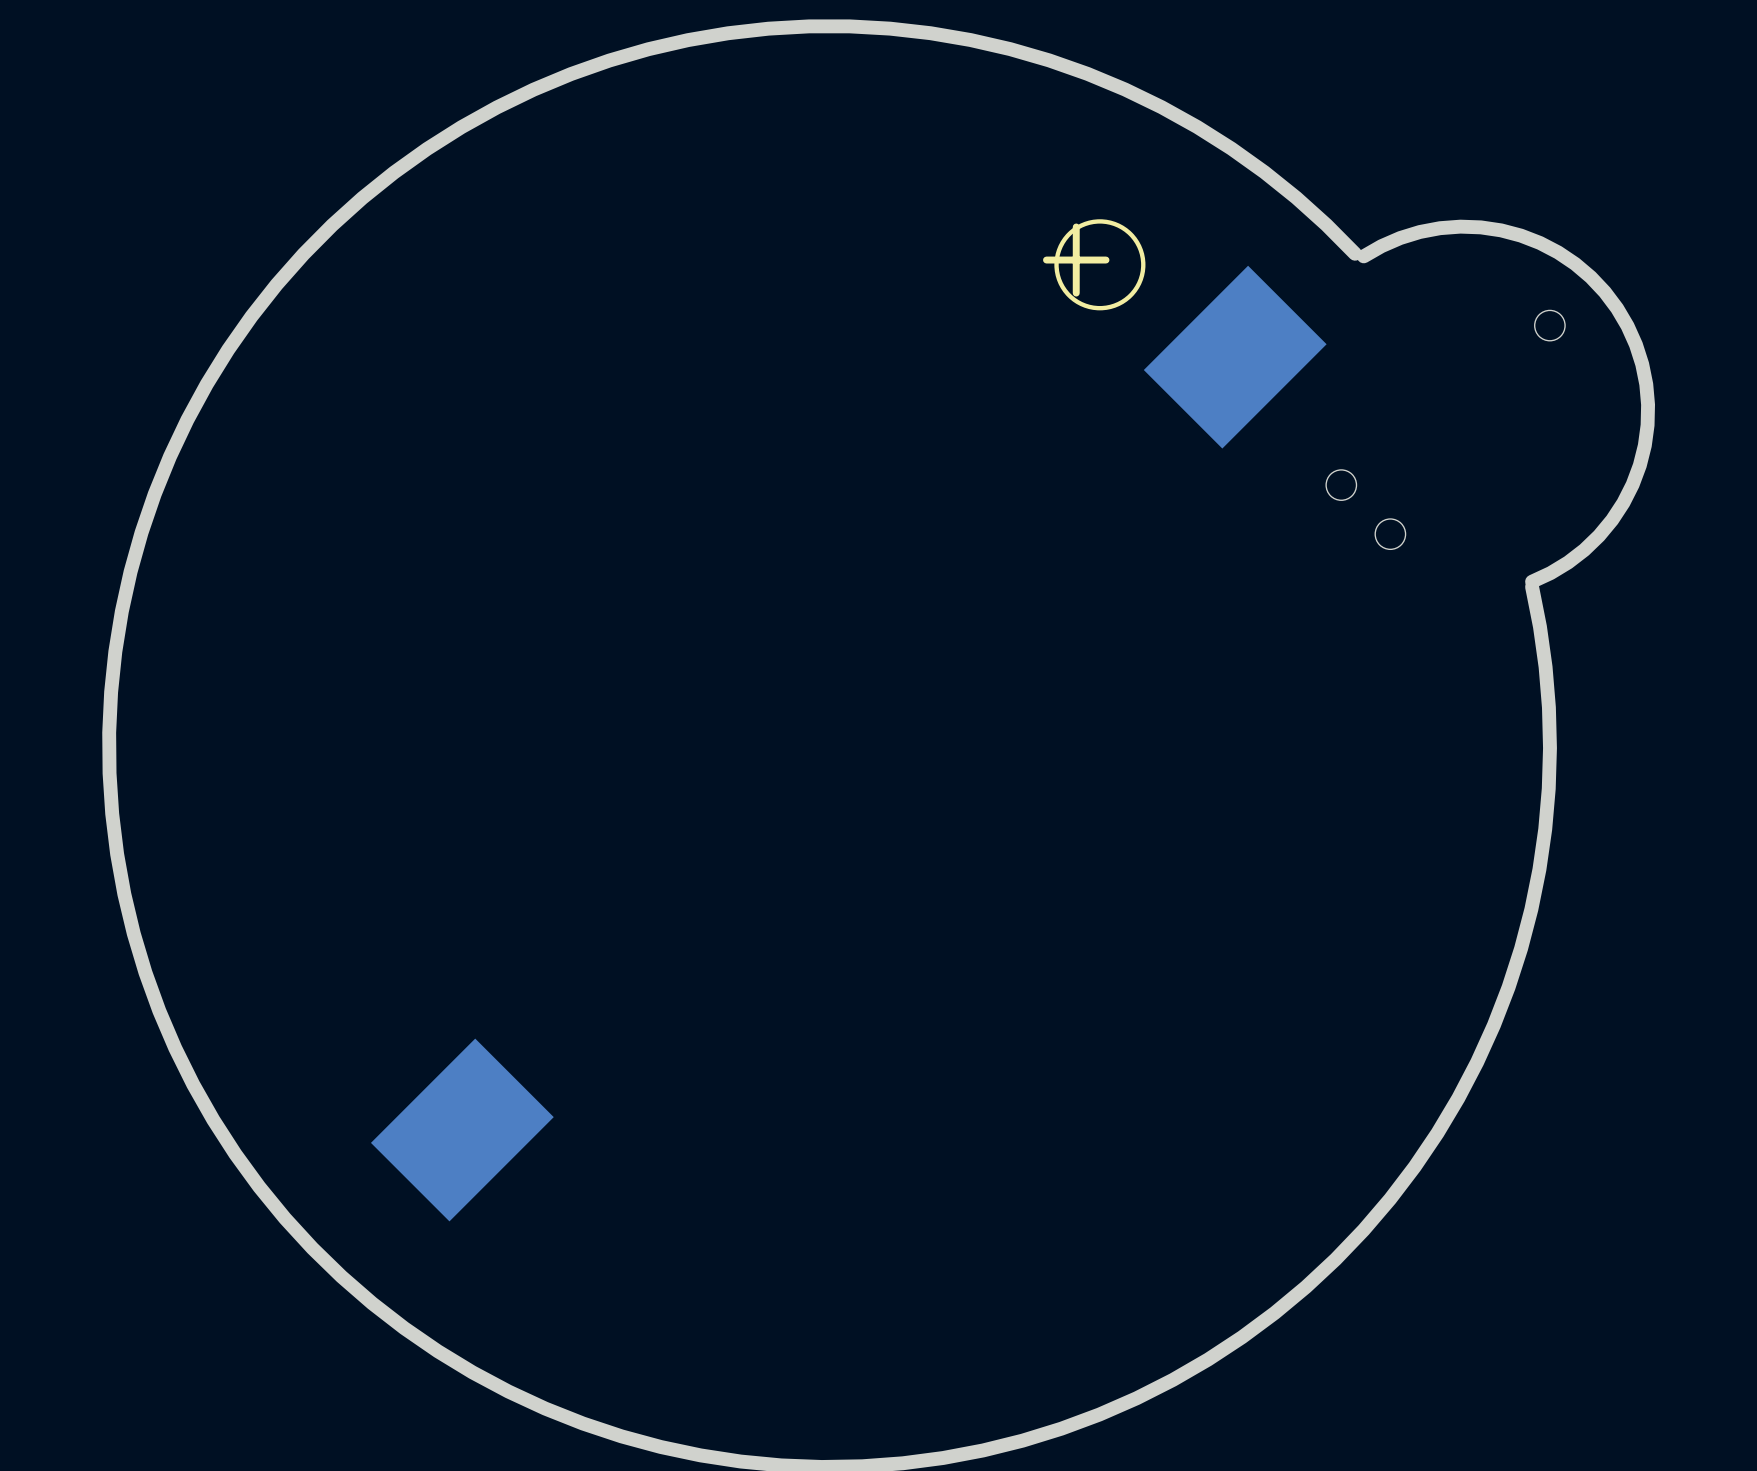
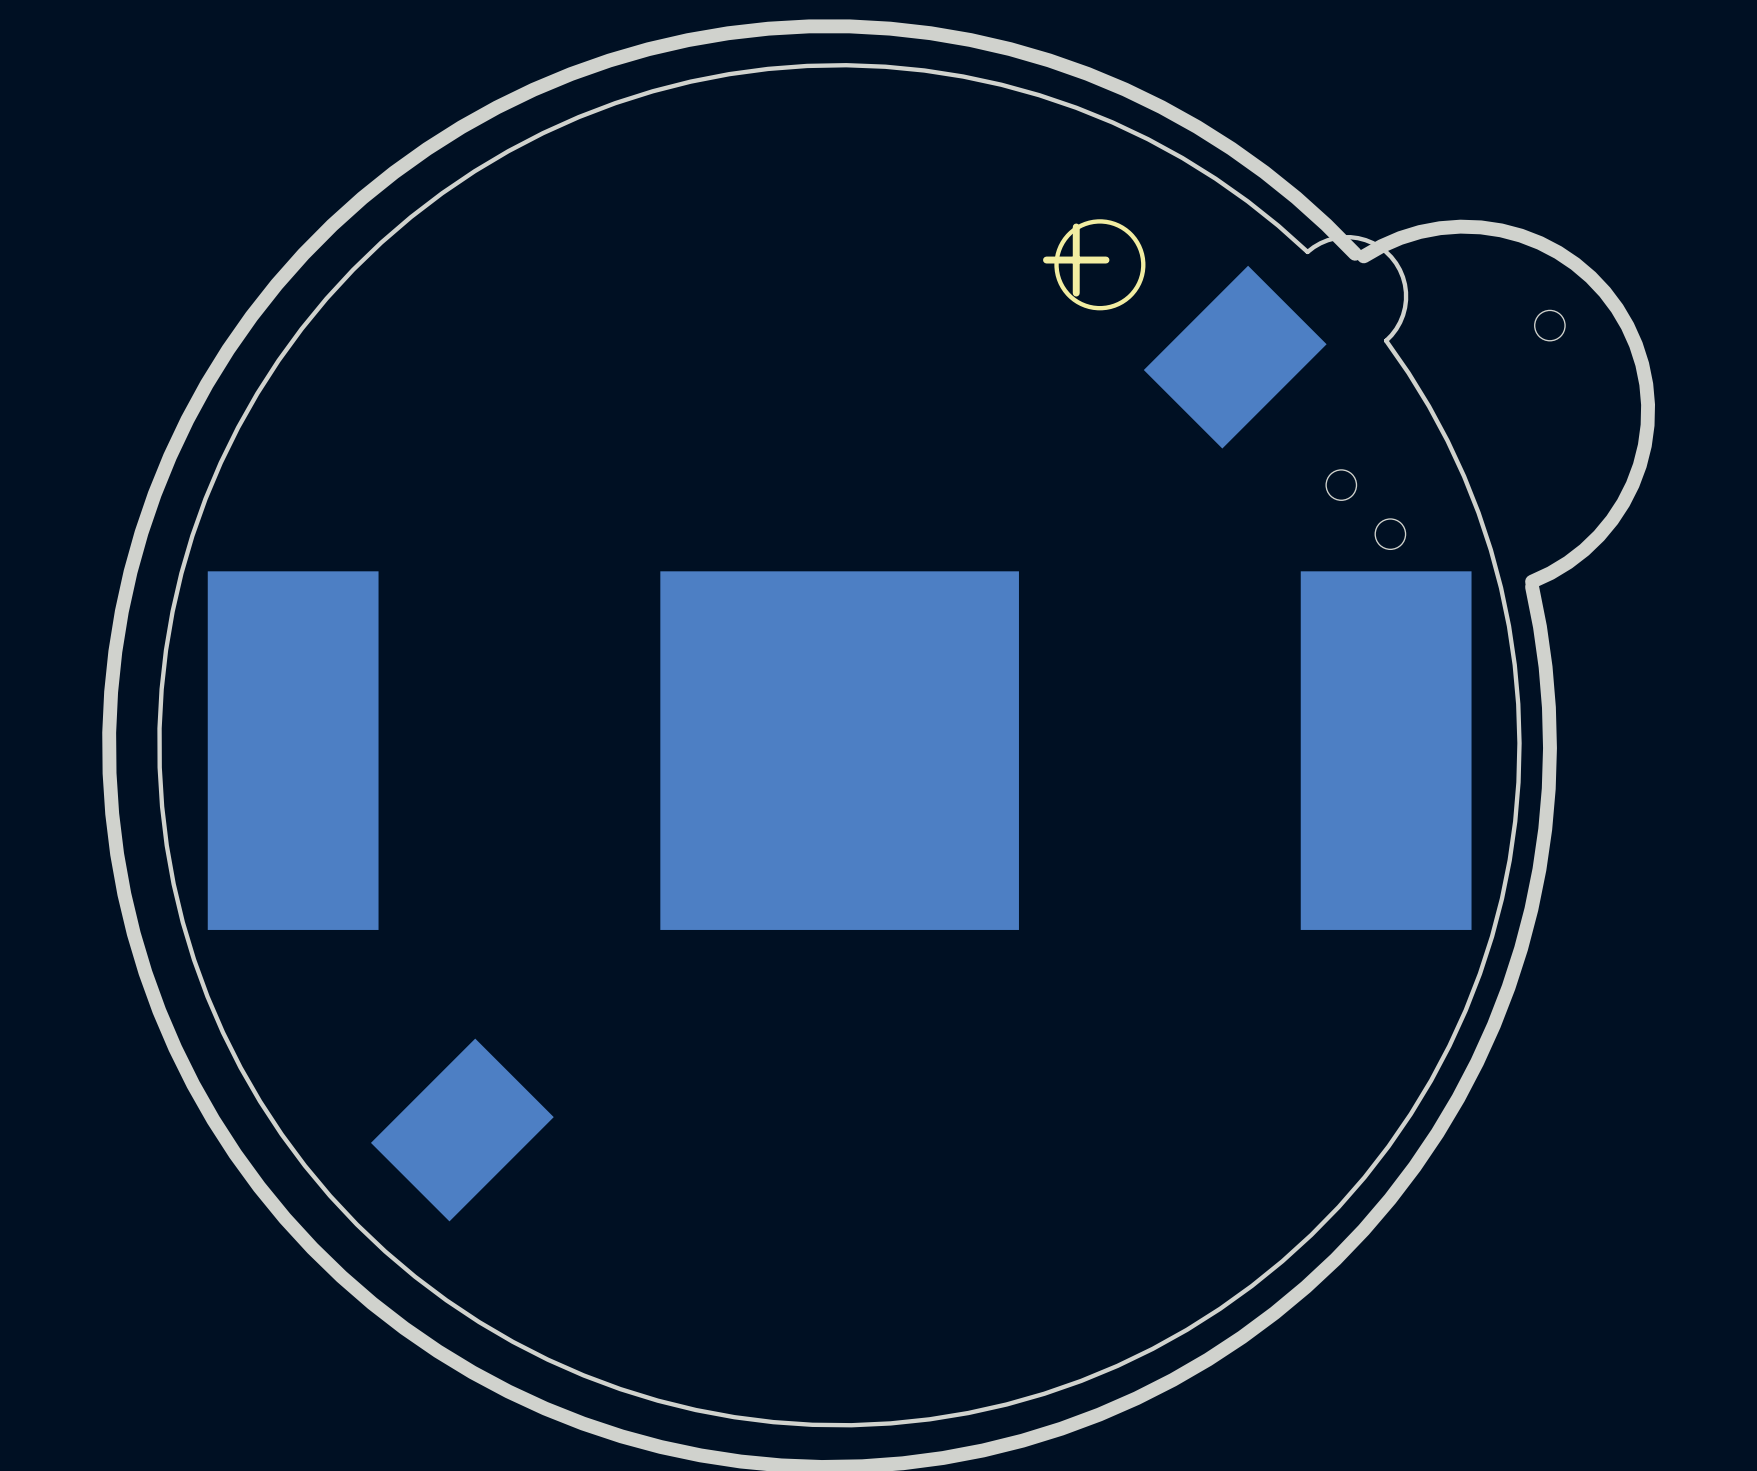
part: none -> (839, 745)

